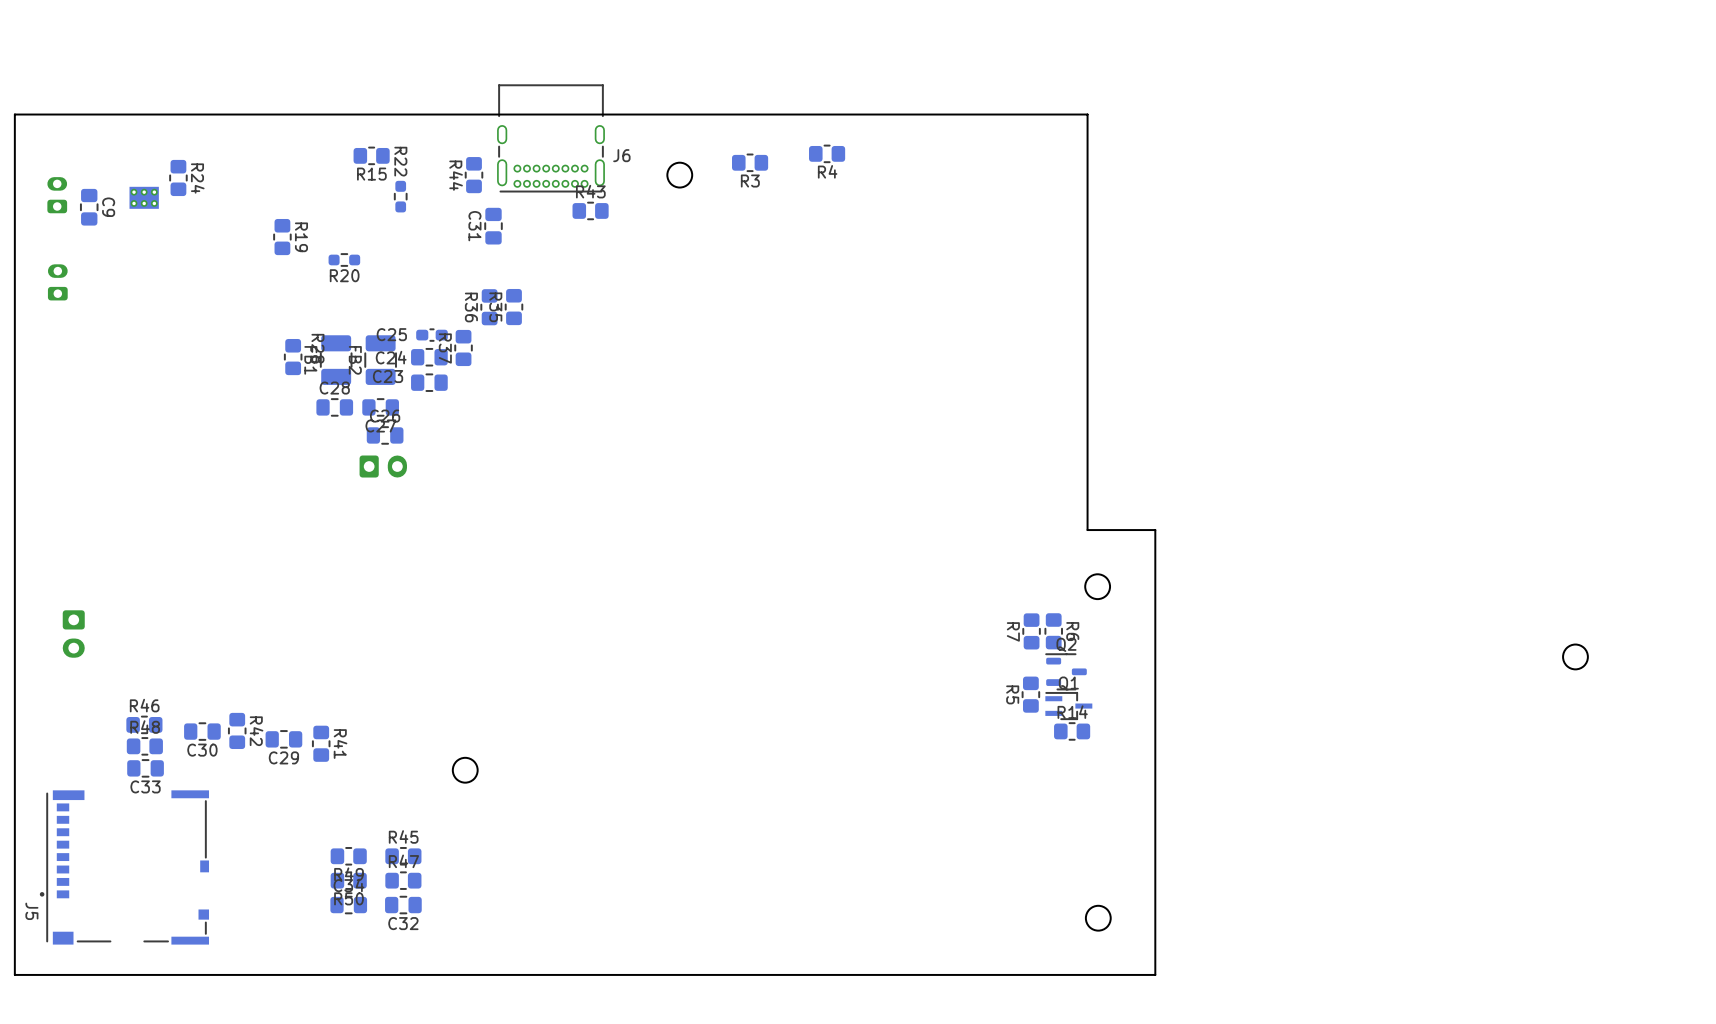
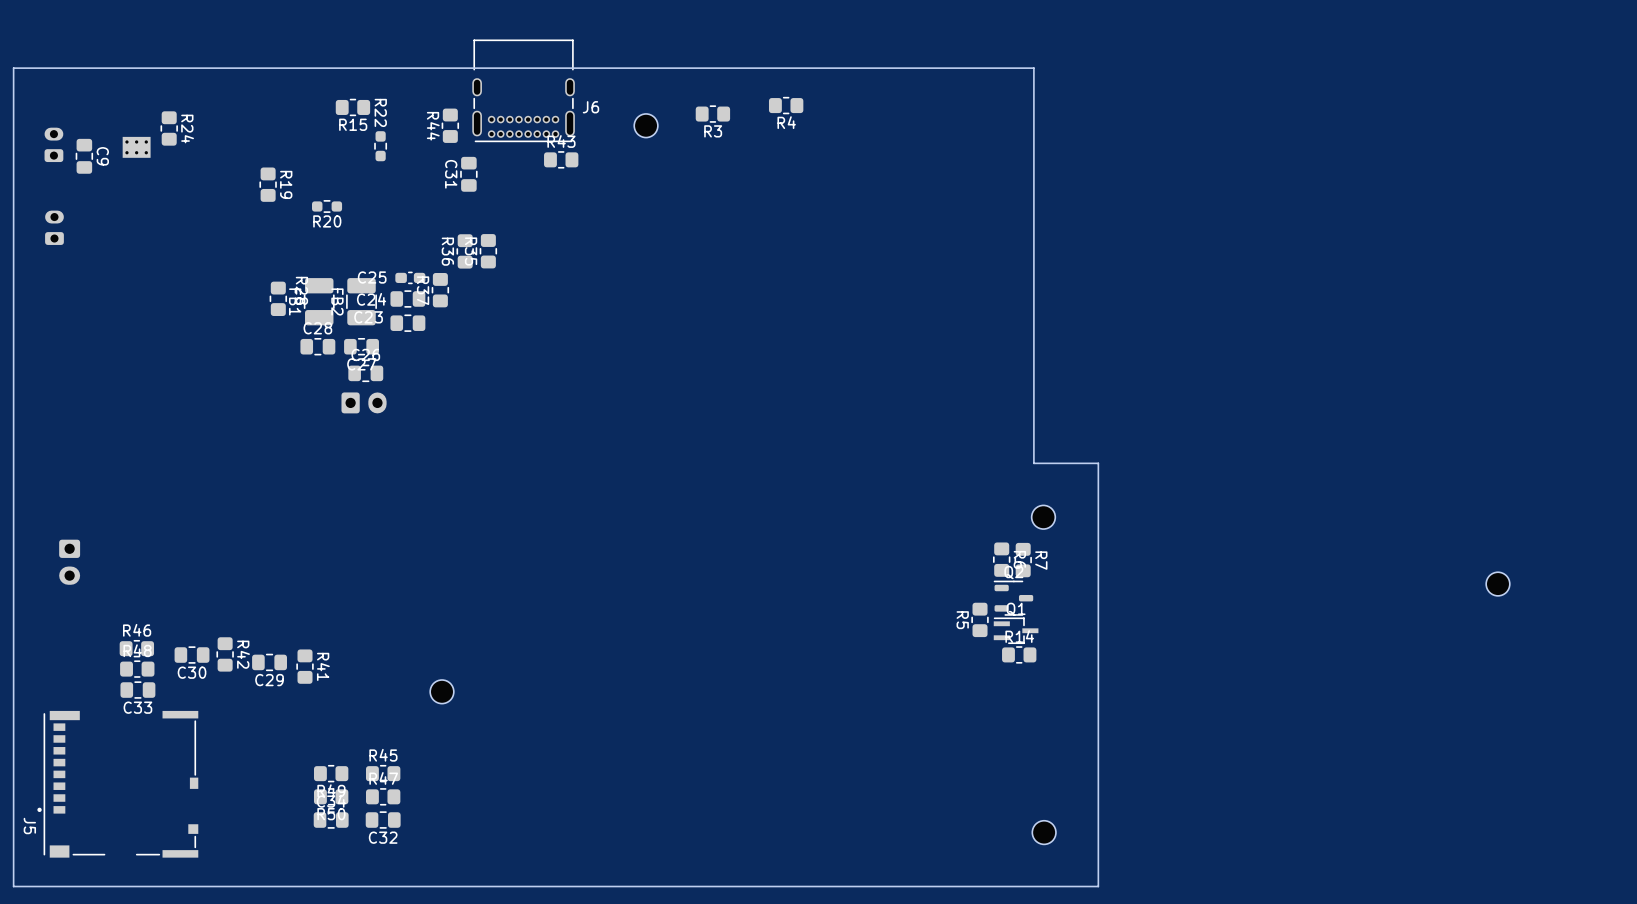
R7 name position: R7 (1013, 631) -> R7 (1041, 560)
R7 position: (1031, 631) -> (1023, 560)

